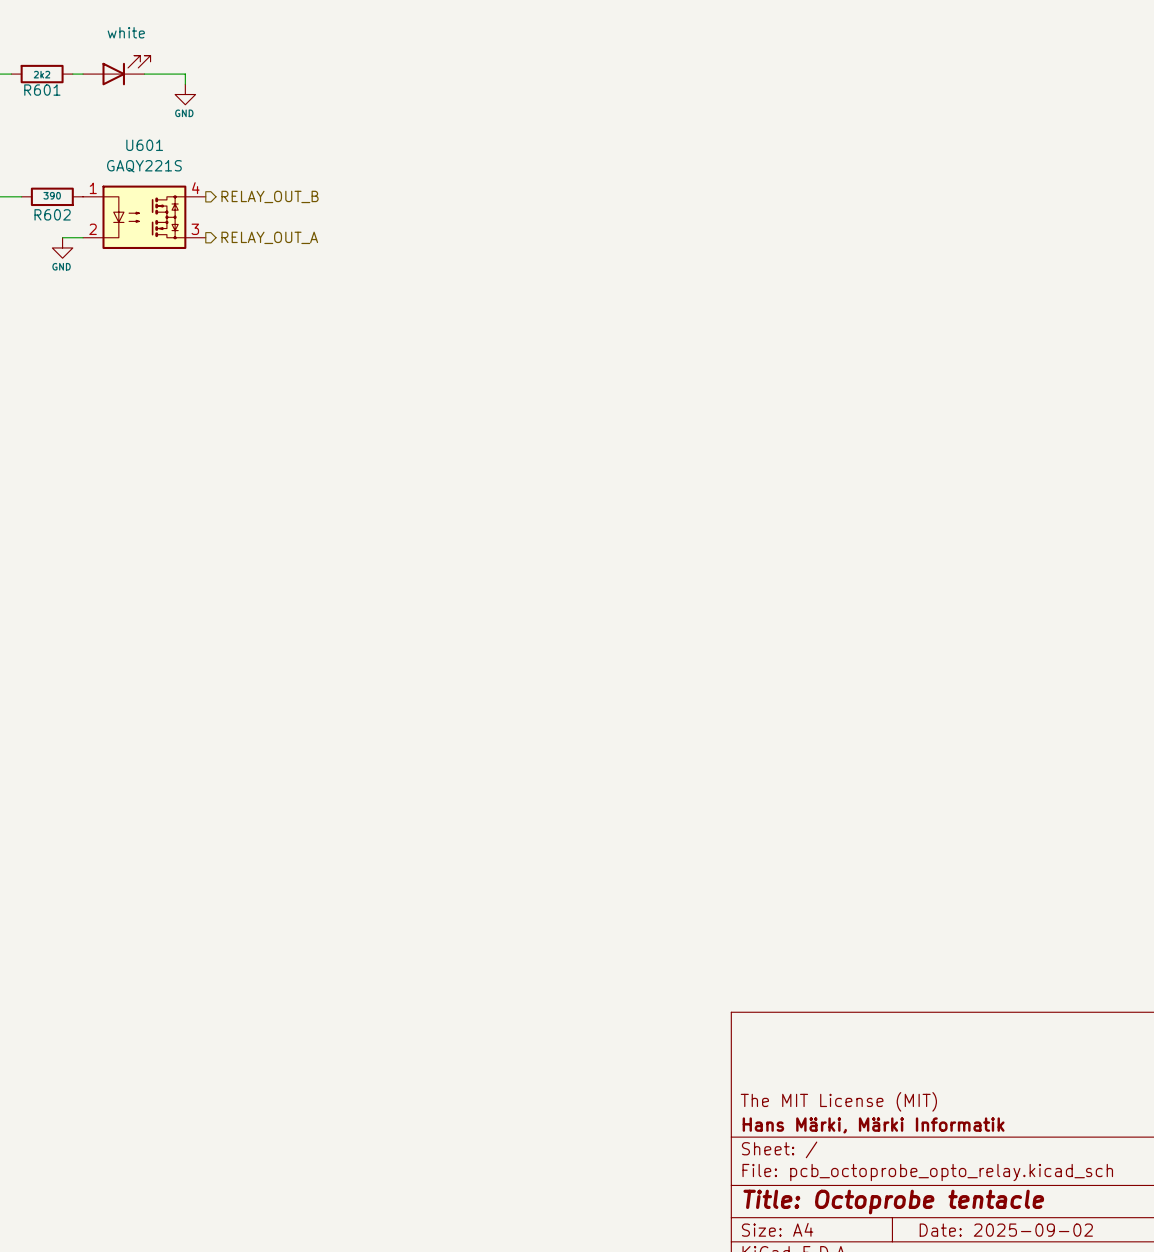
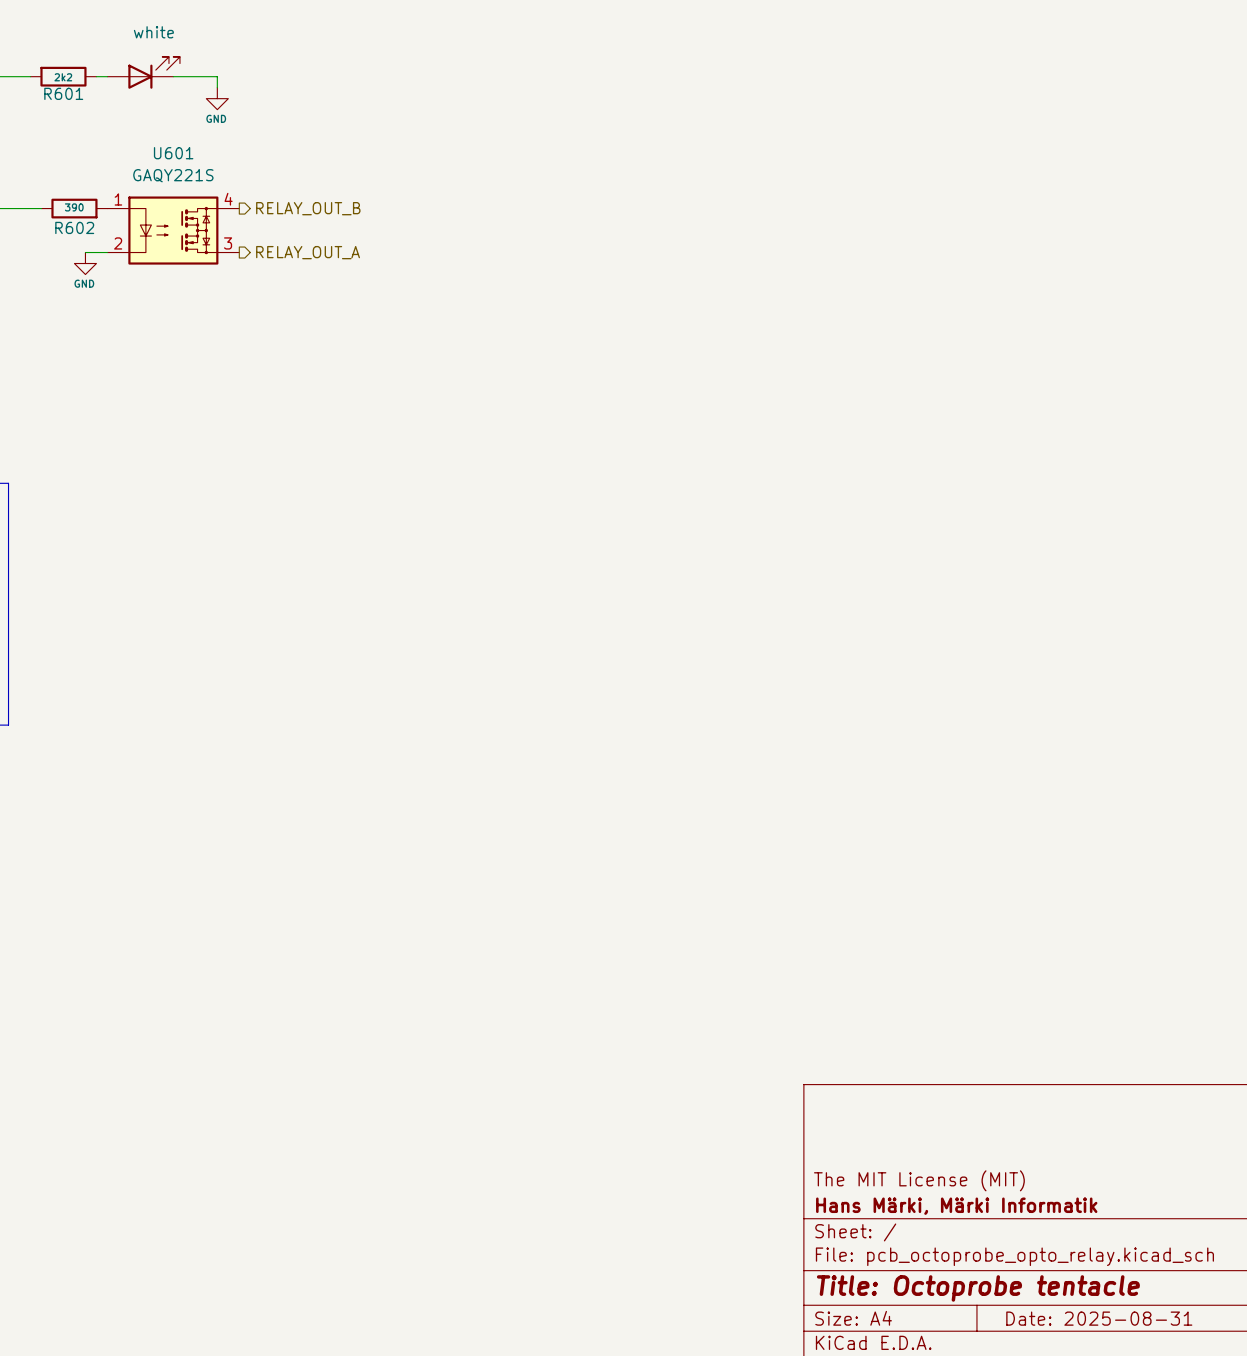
title block: Date: 2025-09-02 (1006, 1230) -> Date: 2025-08-31 (1099, 1318)

